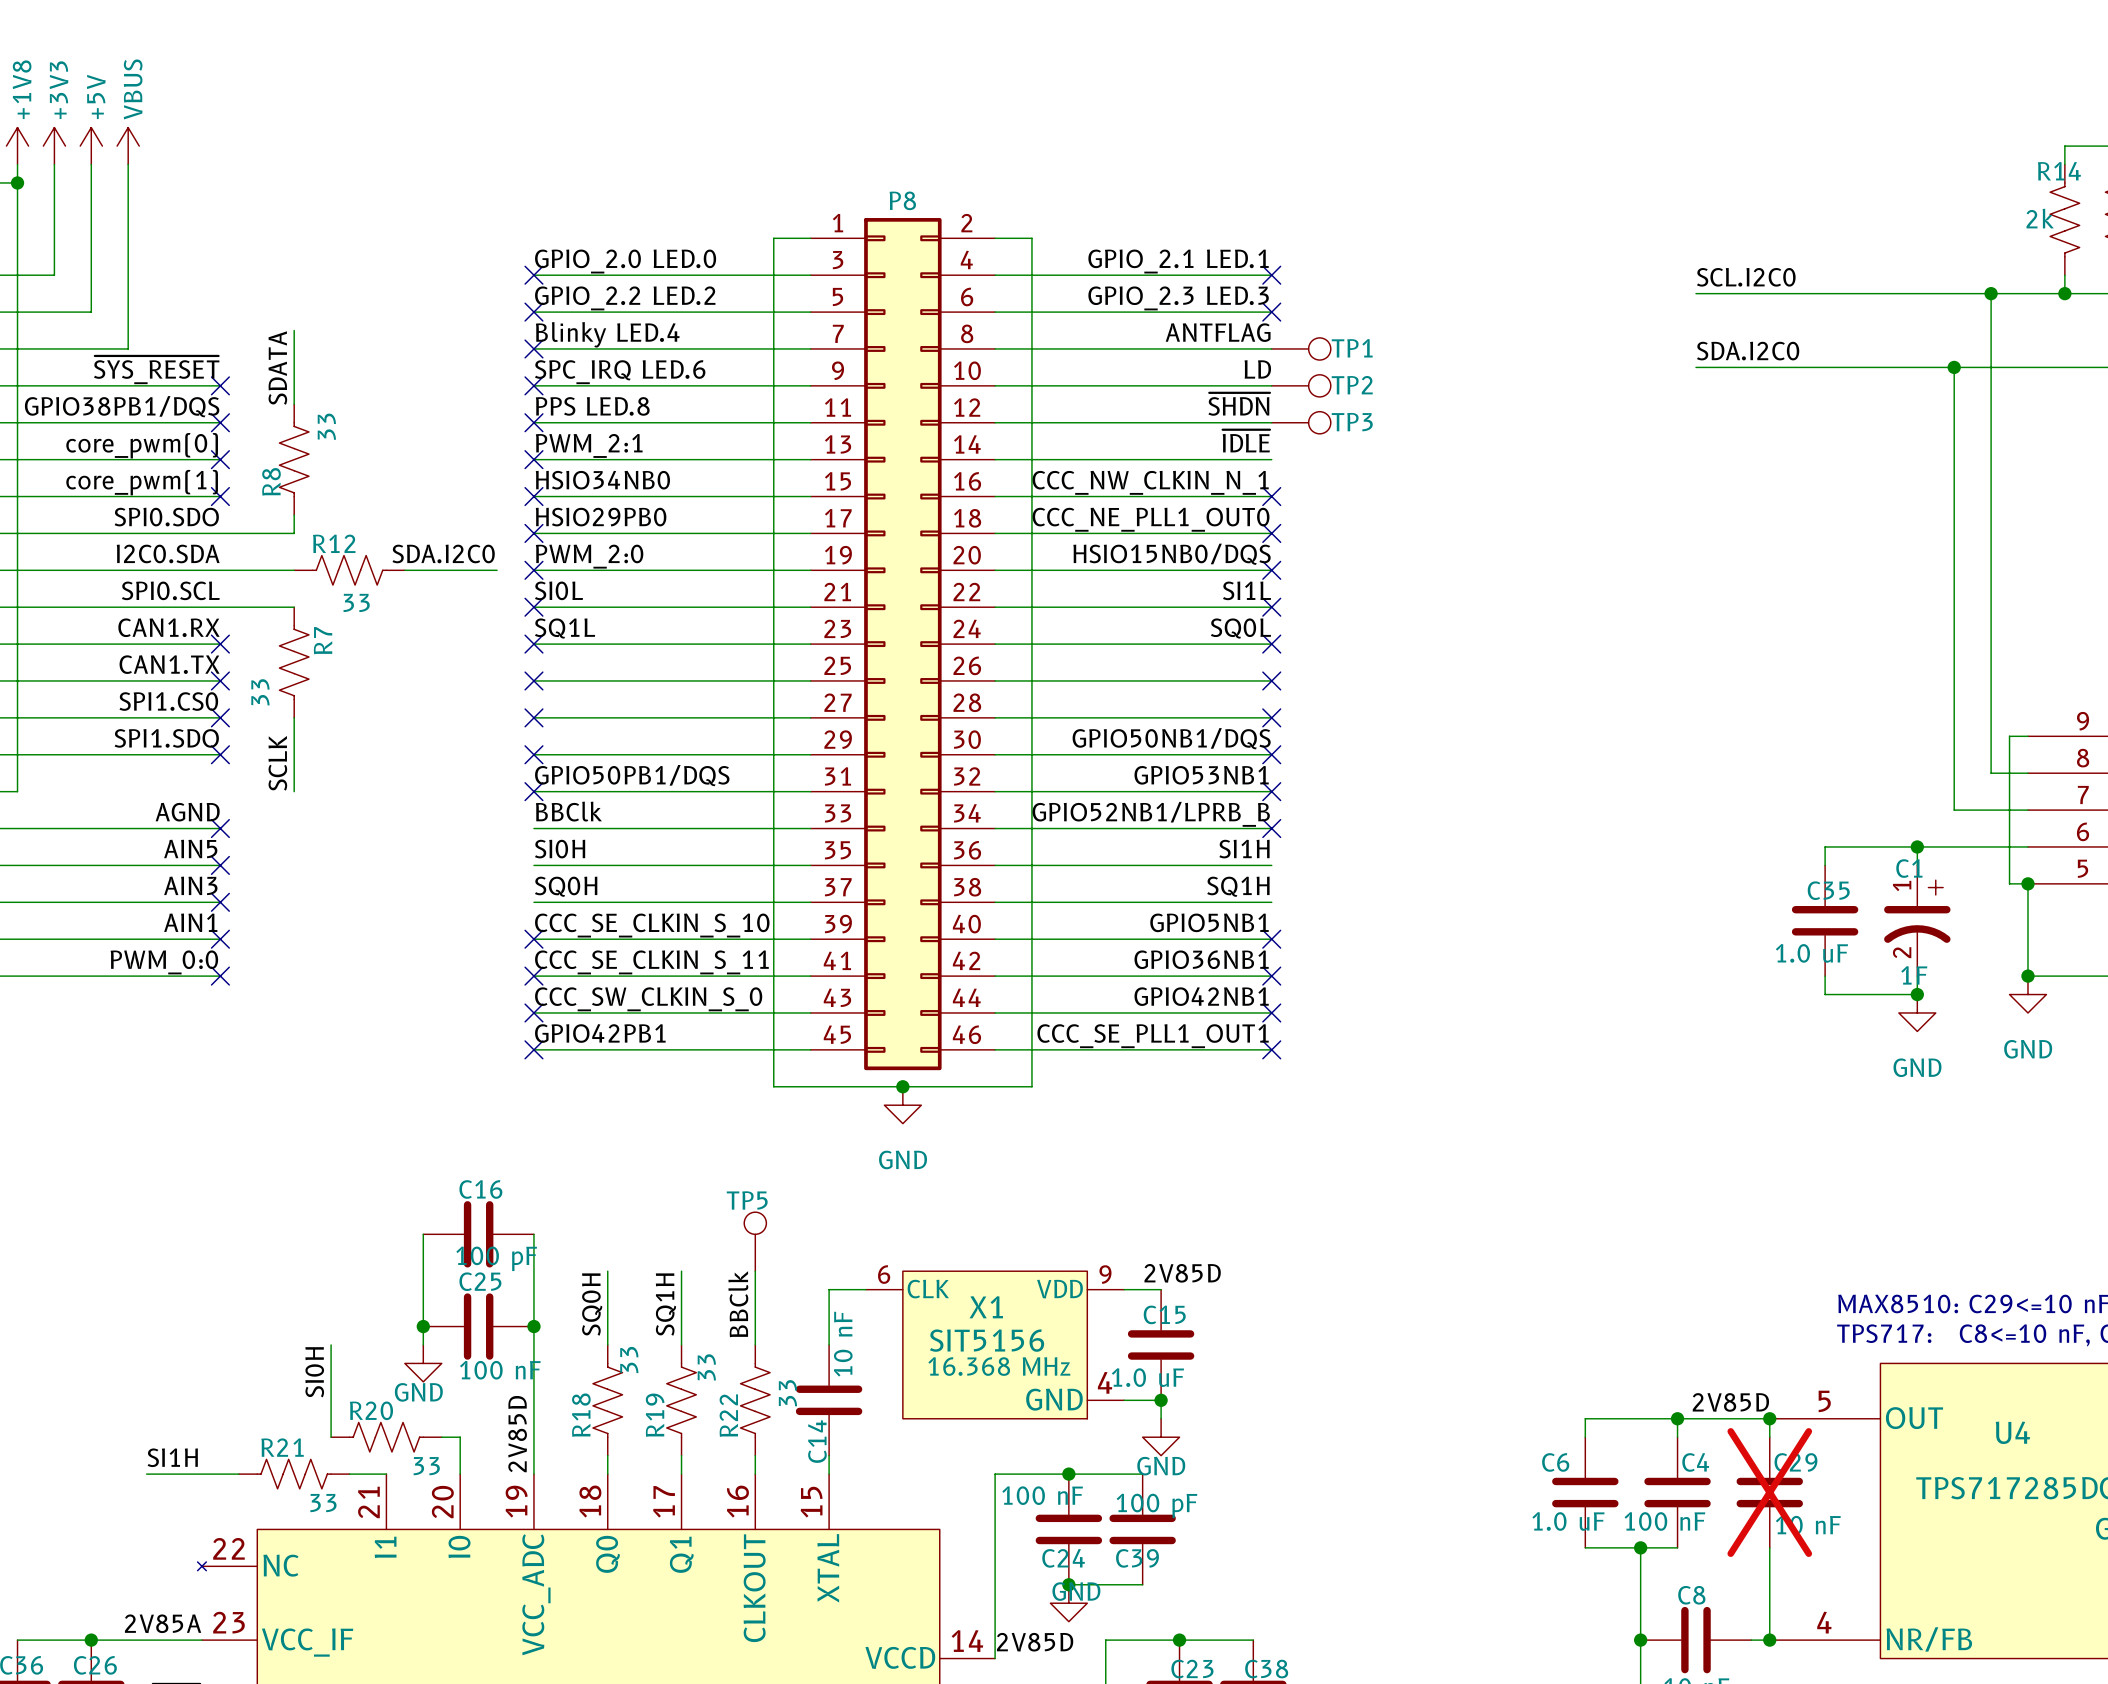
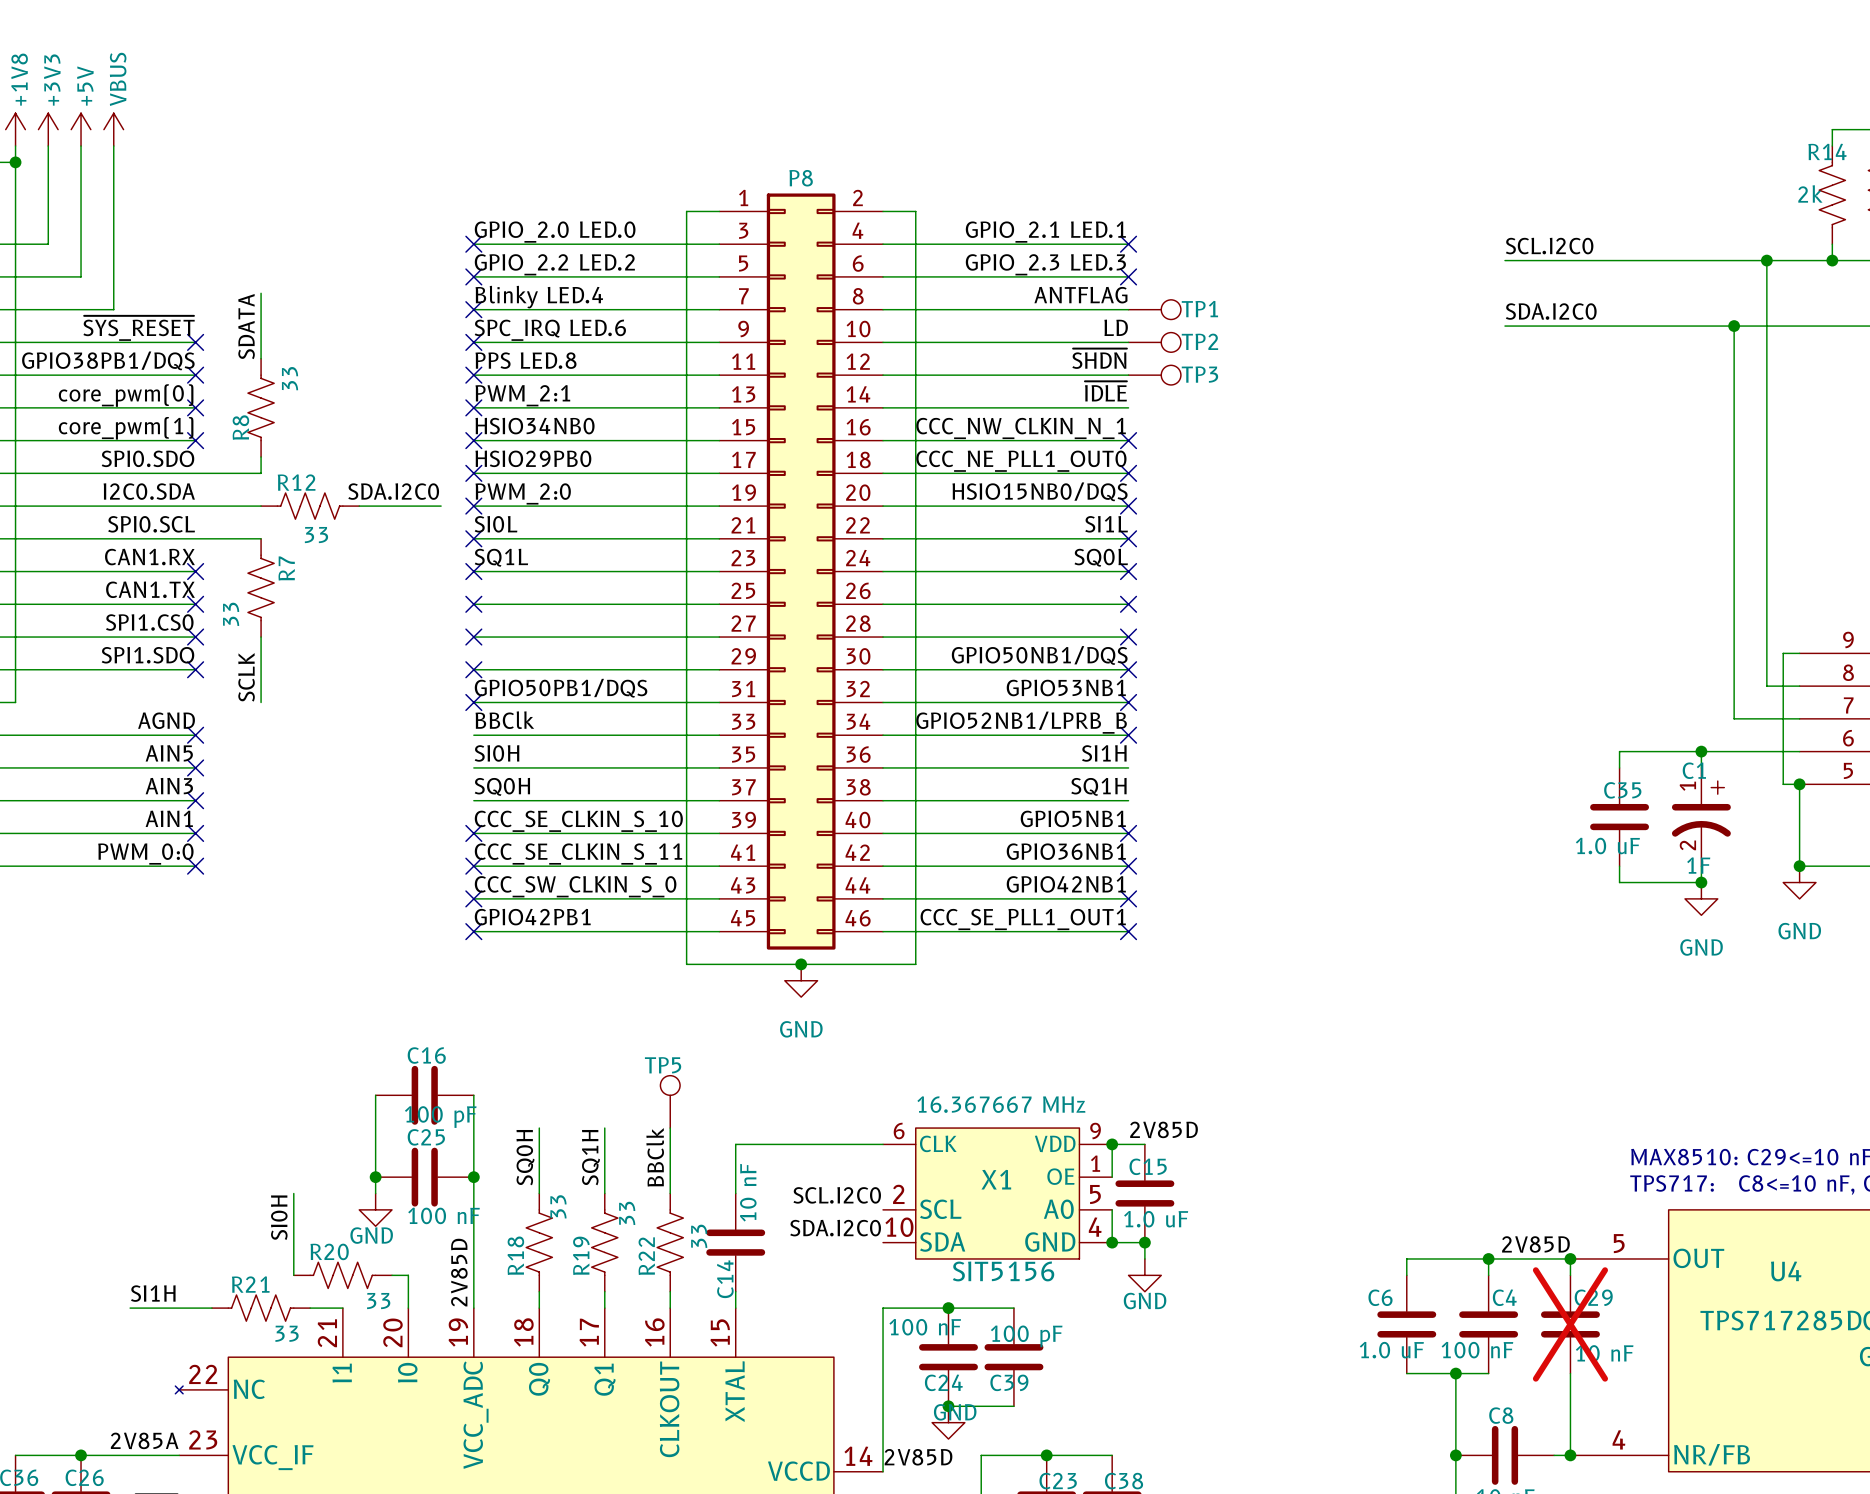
X1 symbol: [865, 1271, 1125, 1419] -> [883, 1128, 1113, 1259]
label position: 2V85D (1182, 1273) -> 2V85D (1164, 1129)
junction: none -> (1112, 1144)
wire: none -> (1144, 1144) (1112, 1144) (1112, 1177)
X1 value position: SIT5156 (987, 1340) -> SIT5156 (1003, 1271)
C15 position: (1161, 1344) -> (1144, 1193)
label: none -> SCL.I2C0 (837, 1195)
wire: none -> (1112, 1209) (1112, 1242) (1144, 1242) (1144, 1258)
X1 text: 16.368 MHz (999, 1366) -> 16.367667 MHz (1001, 1104)
C15 value position: 1.0 uF (1147, 1377) -> 1.0 uF (1156, 1219)
label: none -> SDA.I2C0 (835, 1228)
junction: (1161, 1400) -> none
junction: none -> (1112, 1242)
junction: none -> (1144, 1242)
power symbol position: GND (1161, 1437) -> GND (1144, 1275)

